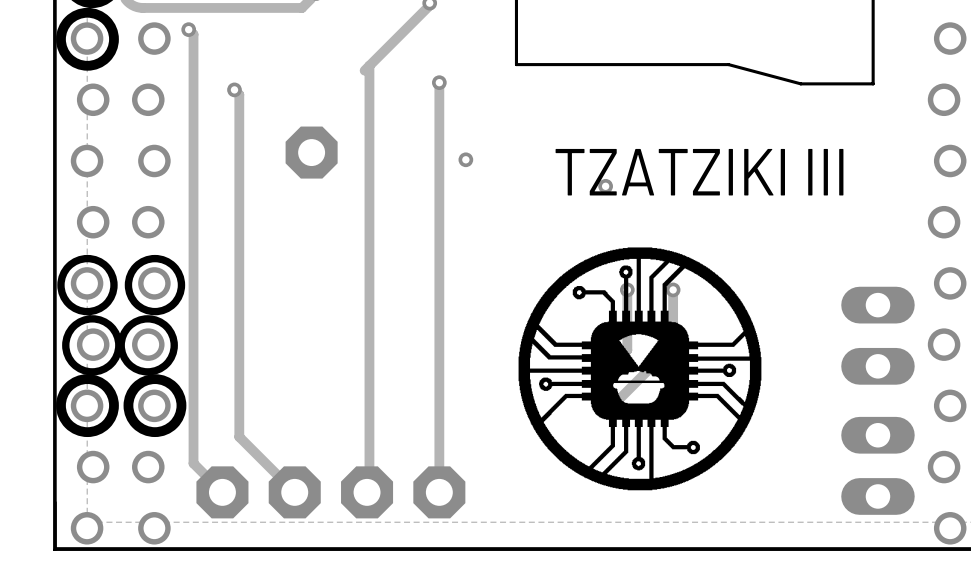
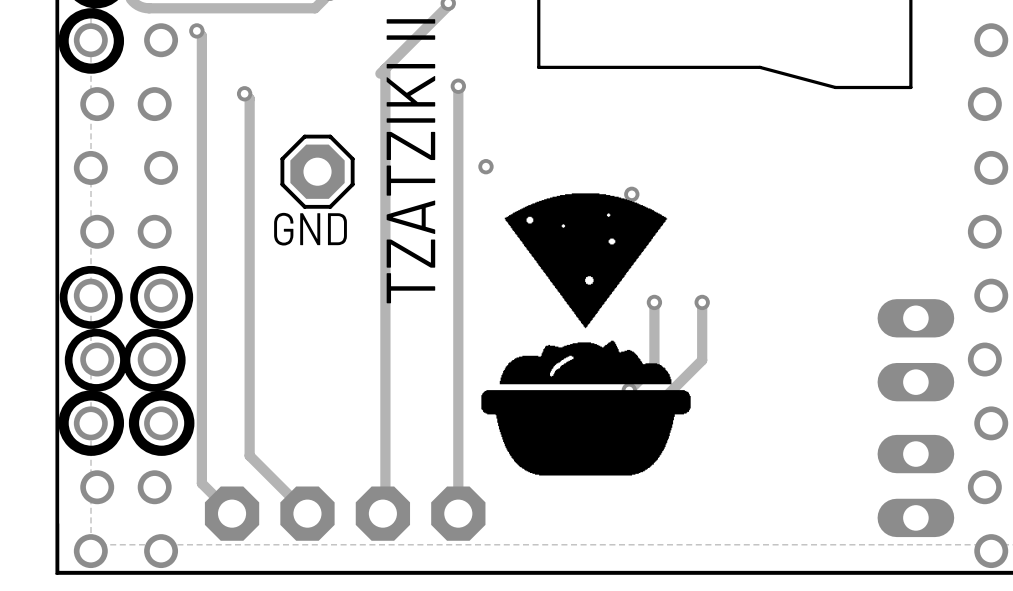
GND side: top (311, 152) -> bottom (317, 171)
text: TZATZIKI III (699, 172) -> TZATZIKI II (410, 161)
drawing: none -> [481, 193, 691, 476]
drawing: [518, 247, 762, 491] -> none

